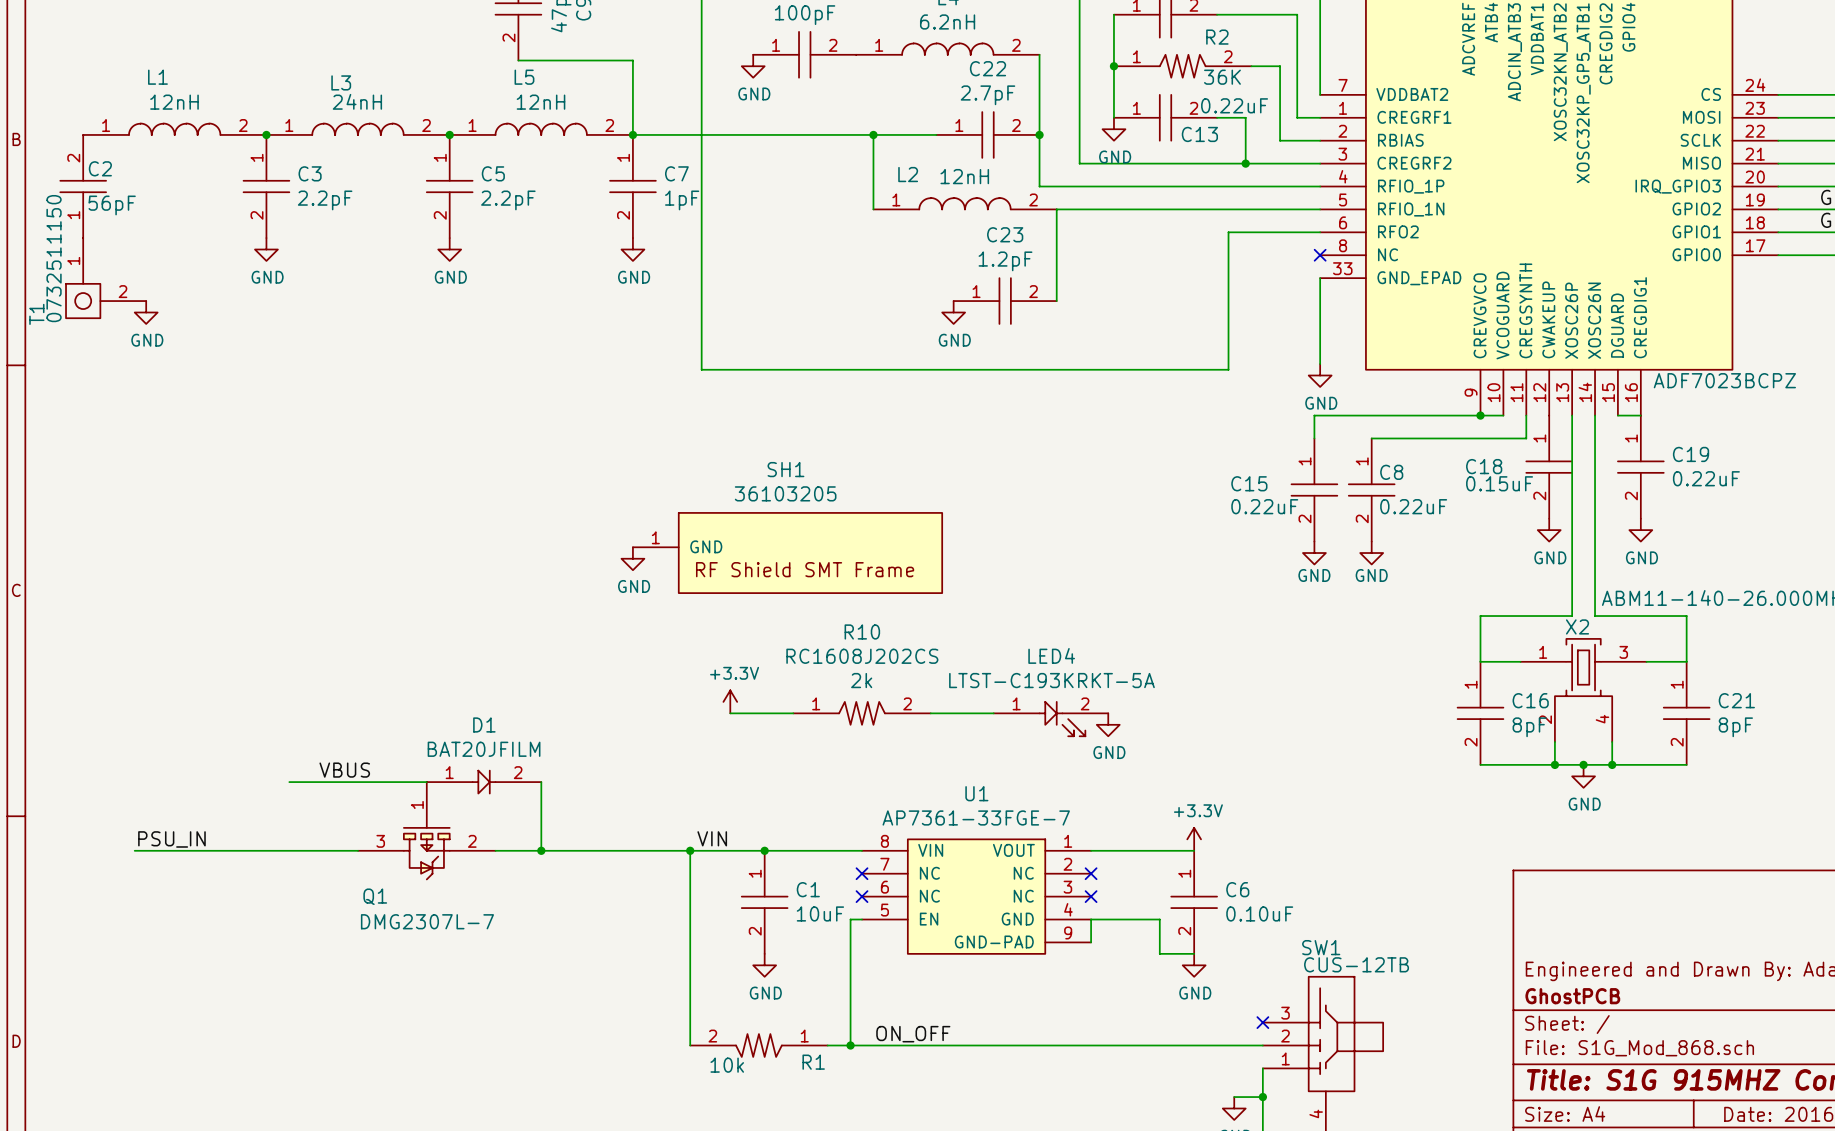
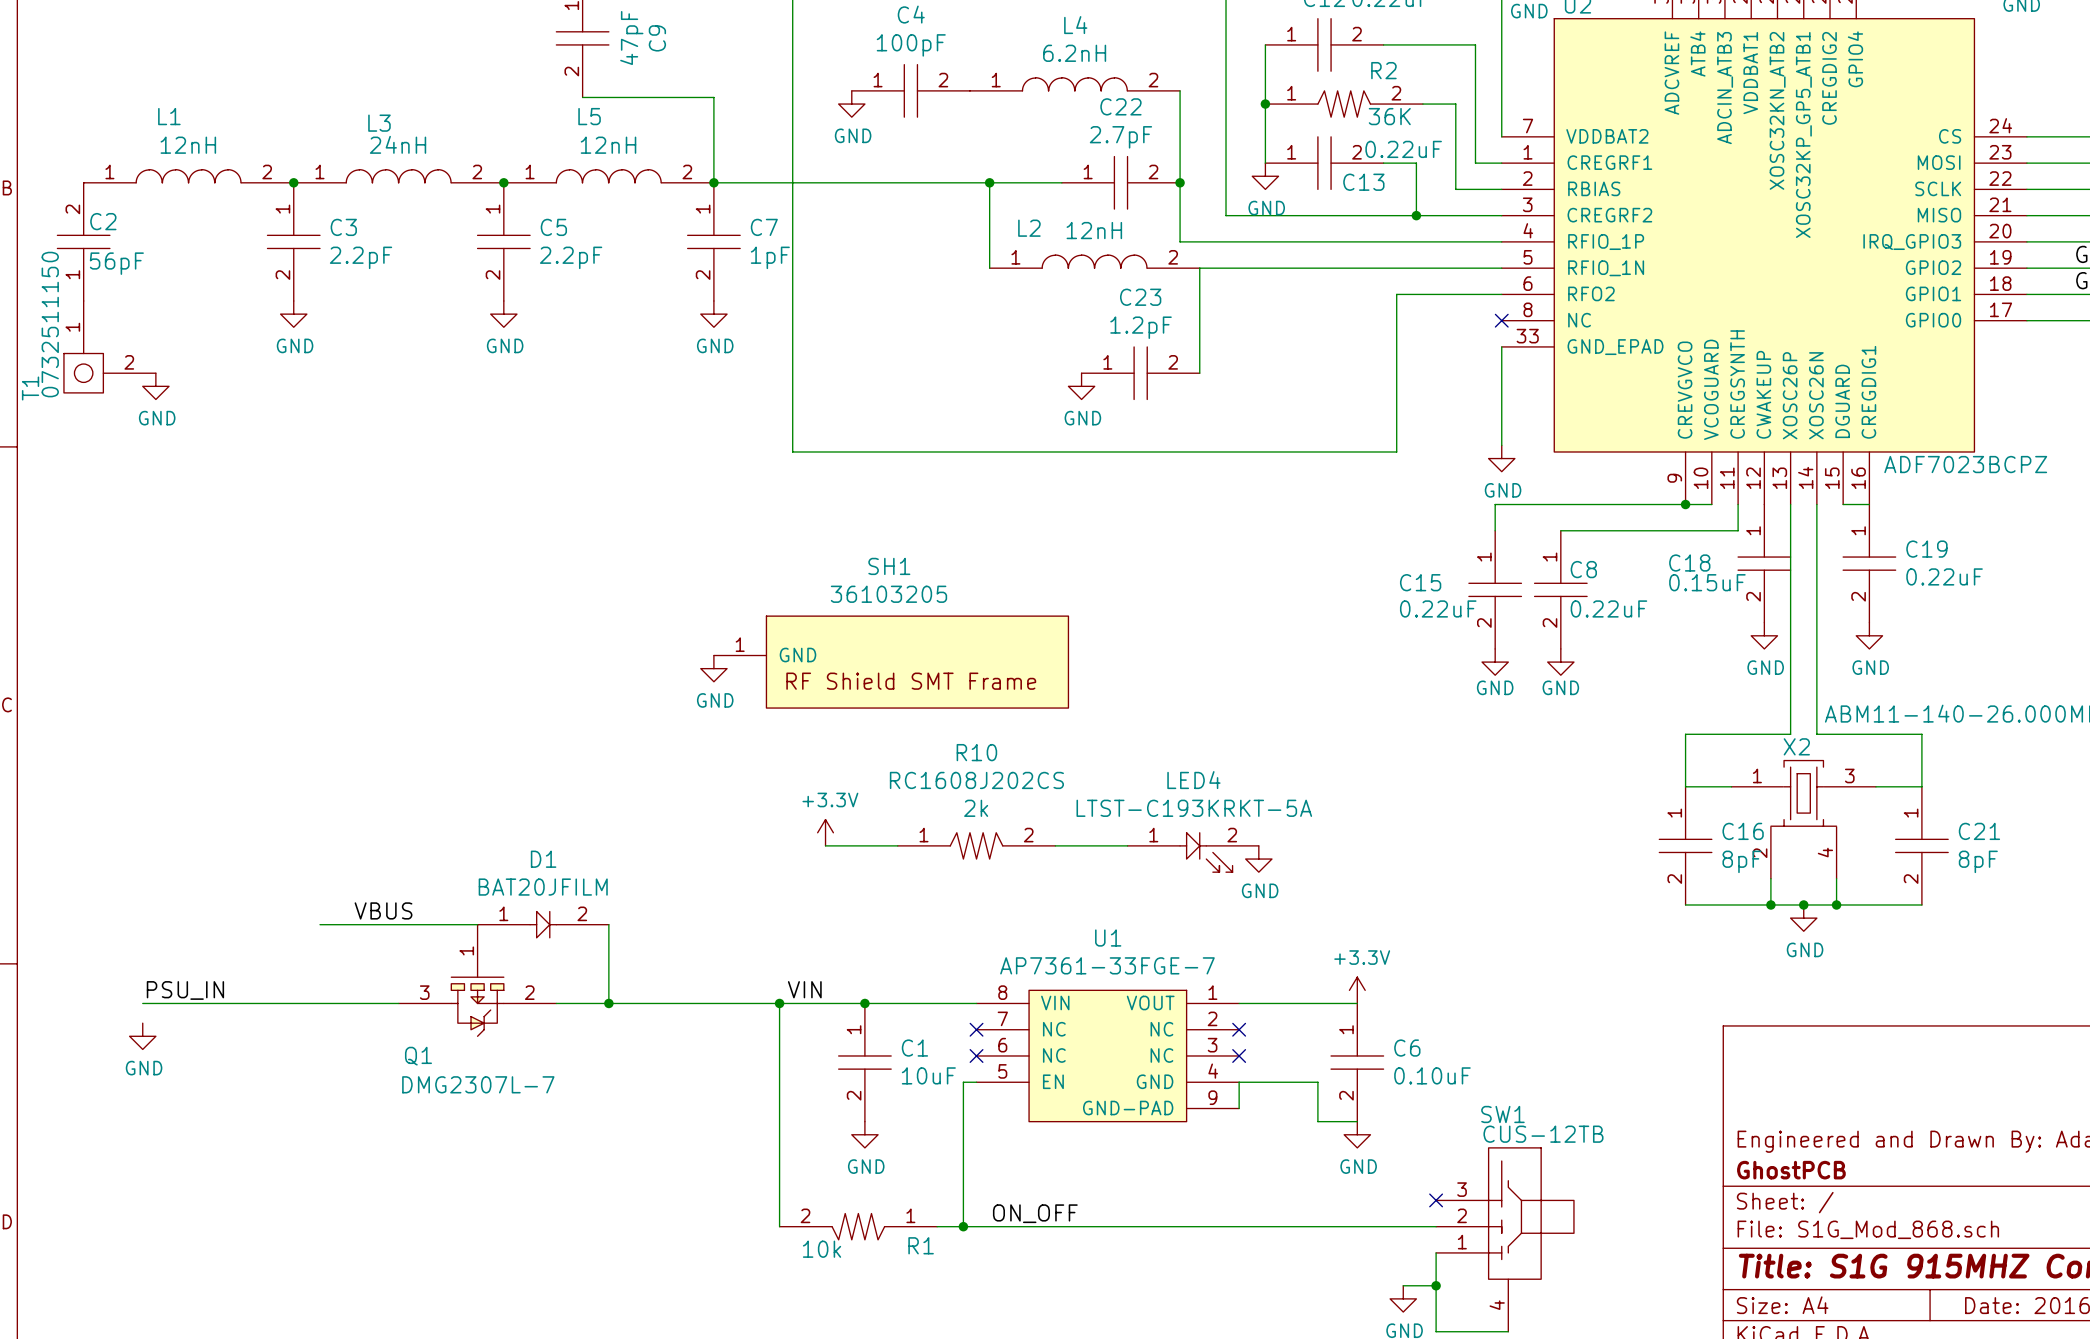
power symbol: none -> GND (142, 1036)

